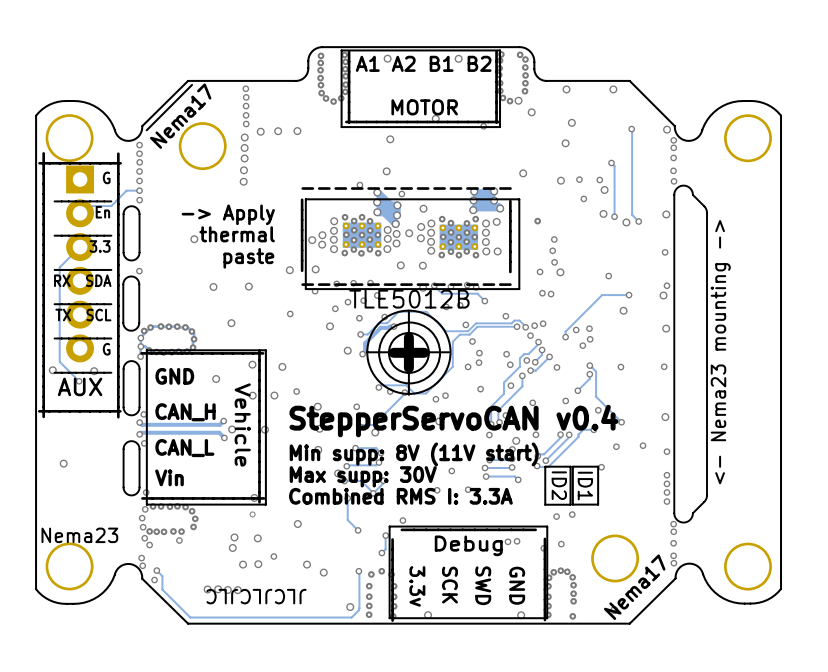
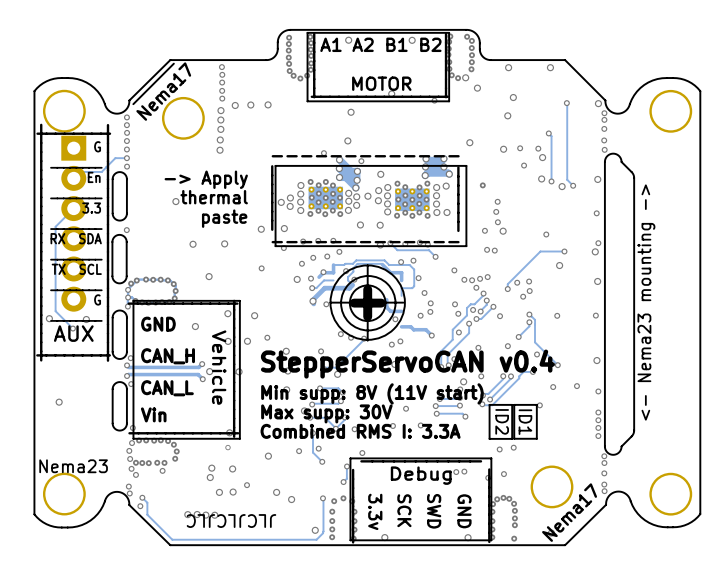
part: TLE5012B (409, 299) -> none
track: none -> (319, 277) (323, 272) (333, 272) (333, 265) (352, 263) (356, 260) (384, 260) (389, 265) (409, 265) (414, 269) (414, 286) (412, 288) (401, 288) (401, 295)
via: none -> (310, 278)
track: (394, 326) (380, 327) (365, 343) (365, 351) (362, 354) -> none
track: (517, 326) (477, 326) (469, 334) (459, 334) (452, 341) (452, 366) (426, 393) (414, 393) (406, 385) (381, 385) (378, 387) -> none
track: none -> (333, 280) (324, 280) (316, 288) (312, 288)
track: none -> (401, 280) (401, 272) (390, 272) (381, 263) (357, 263) (347, 277) (347, 280) (352, 285) (349, 288) (324, 288) (313, 299) (313, 303)
track: (525, 327) (519, 320) (514, 320) (511, 323) (476, 323) (468, 331) (445, 331) (426, 311) (398, 311) (387, 323) (378, 323) (367, 334) (360, 334) -> none
via: (360, 334) -> none
via: none -> (312, 288)
track: none -> (386, 299) (386, 307) (390, 311) (401, 311)
via: none -> (395, 319)
track: none -> (401, 326) (425, 329) (431, 335)
via: (489, 435) -> none
via: none -> (354, 429)
via: none -> (318, 448)
via: none -> (299, 451)

